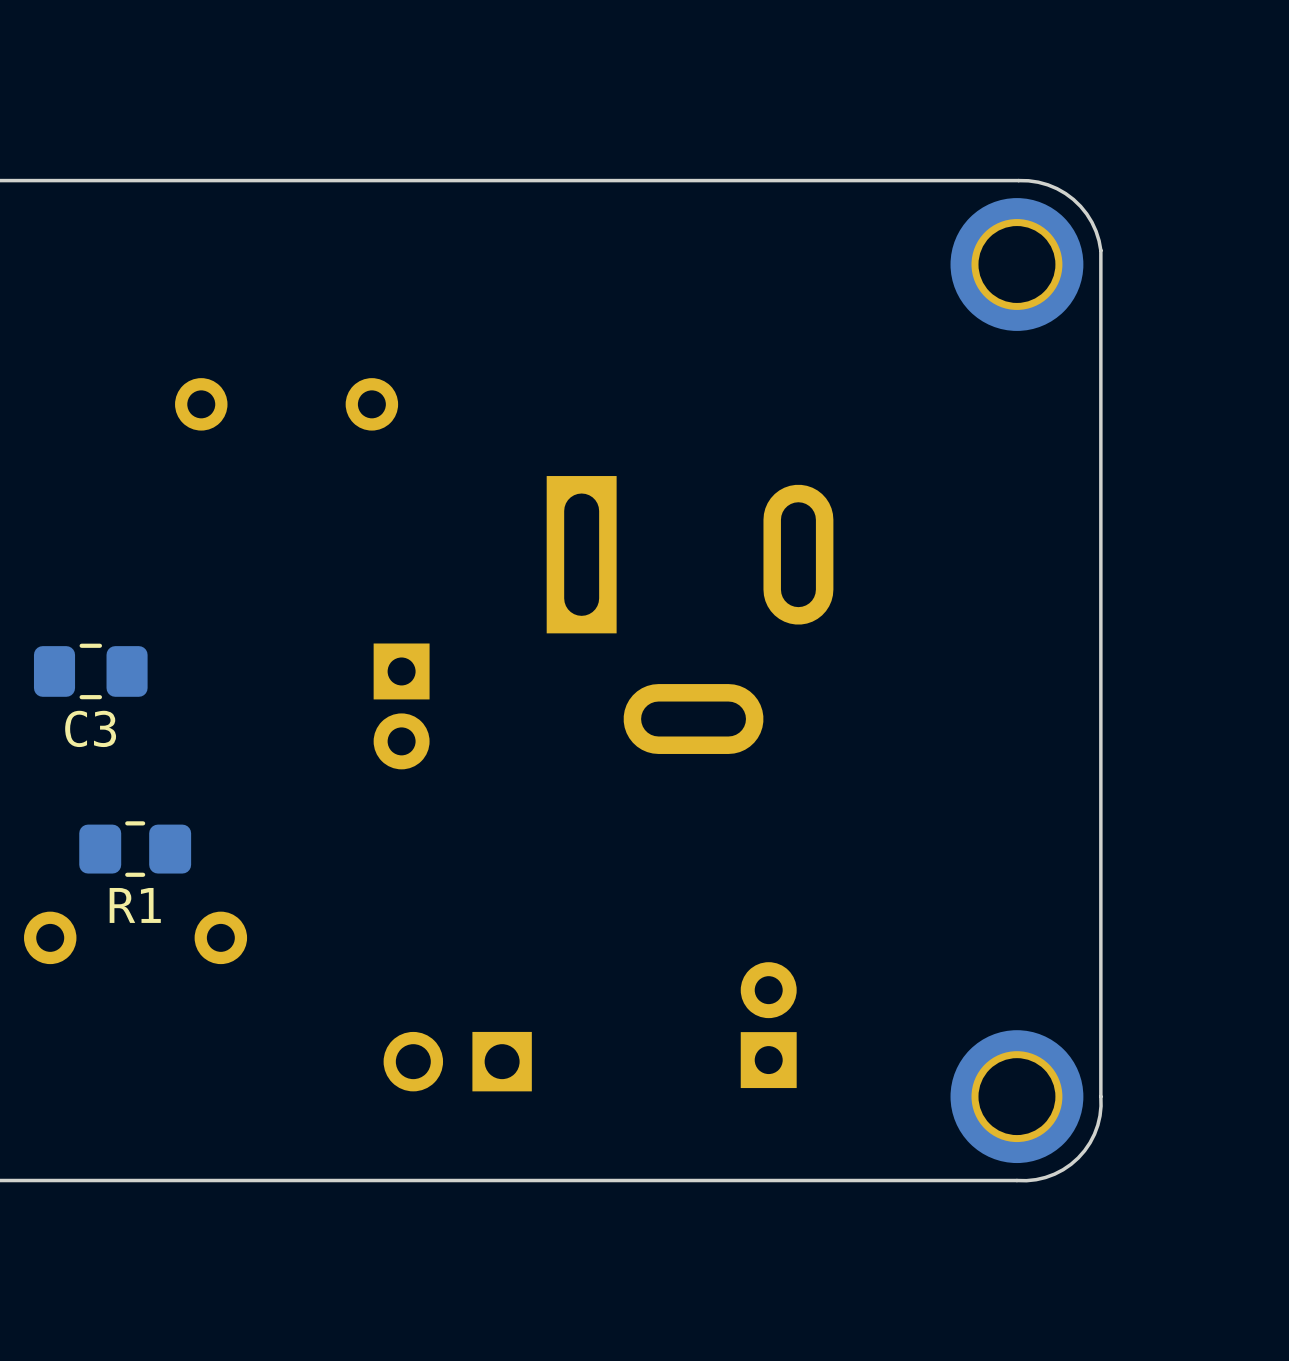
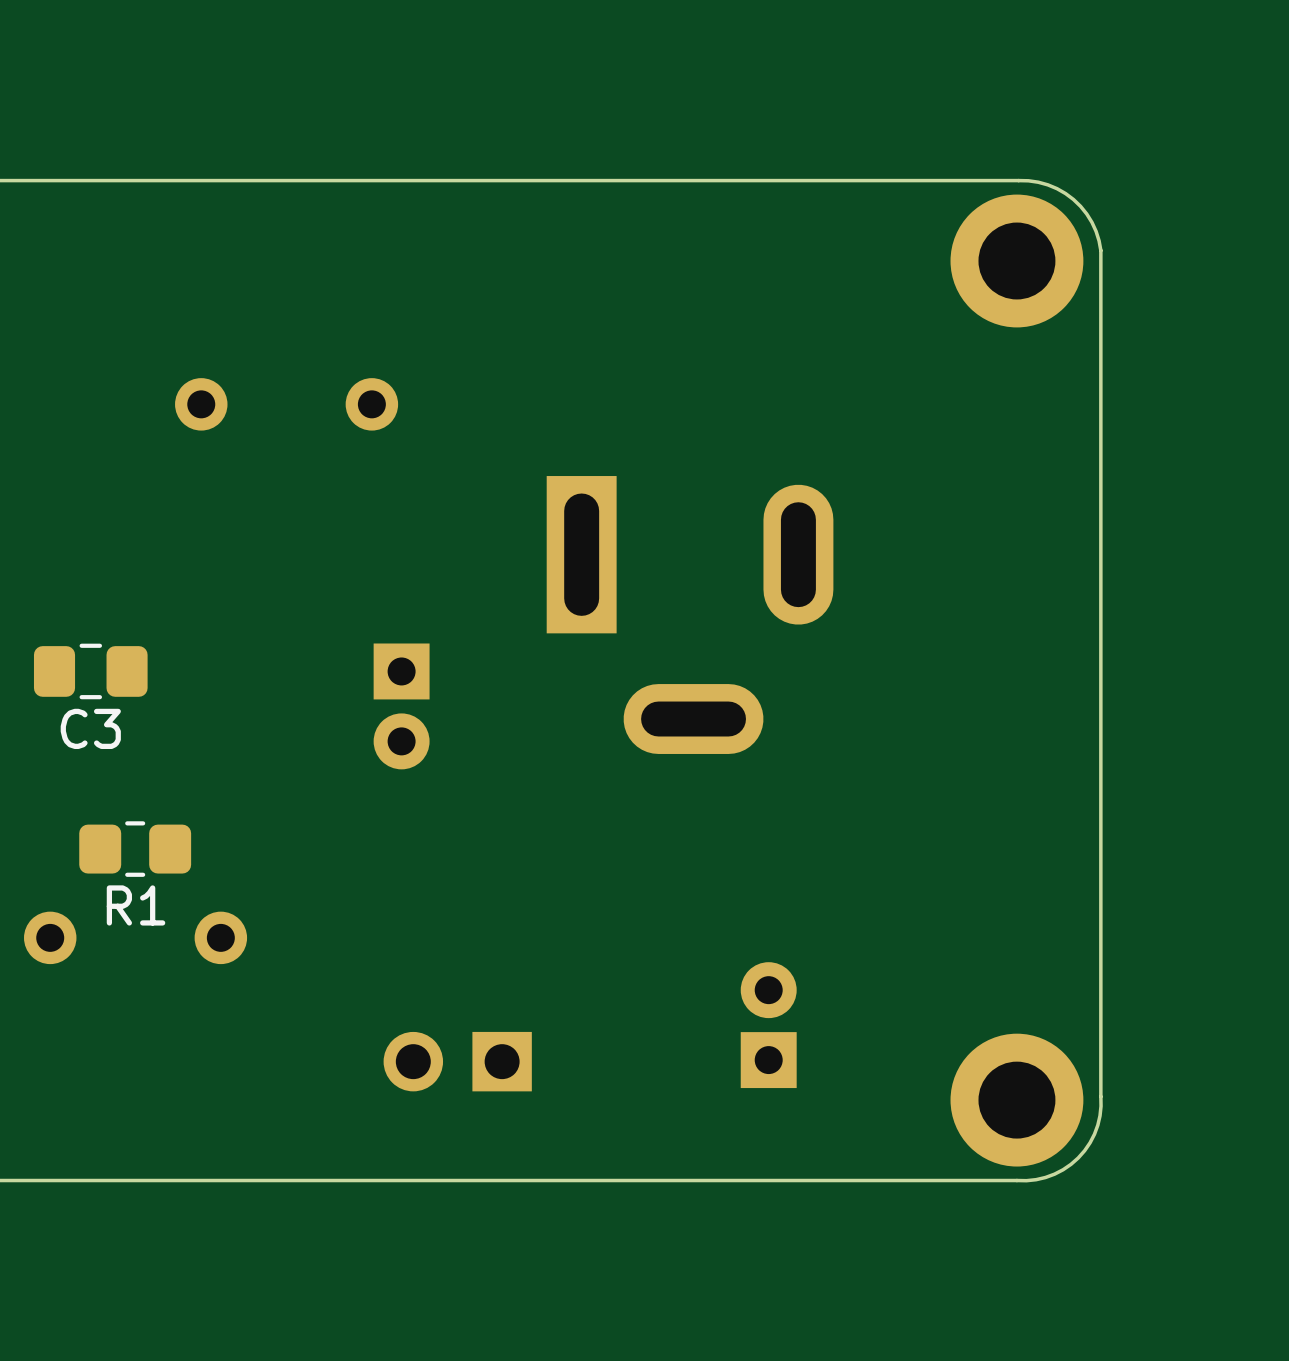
part footprint: [950, 198, 1084, 331] -> [950, 194, 1084, 328]
part footprint: [950, 1030, 1084, 1164] -> [950, 1033, 1084, 1167]

